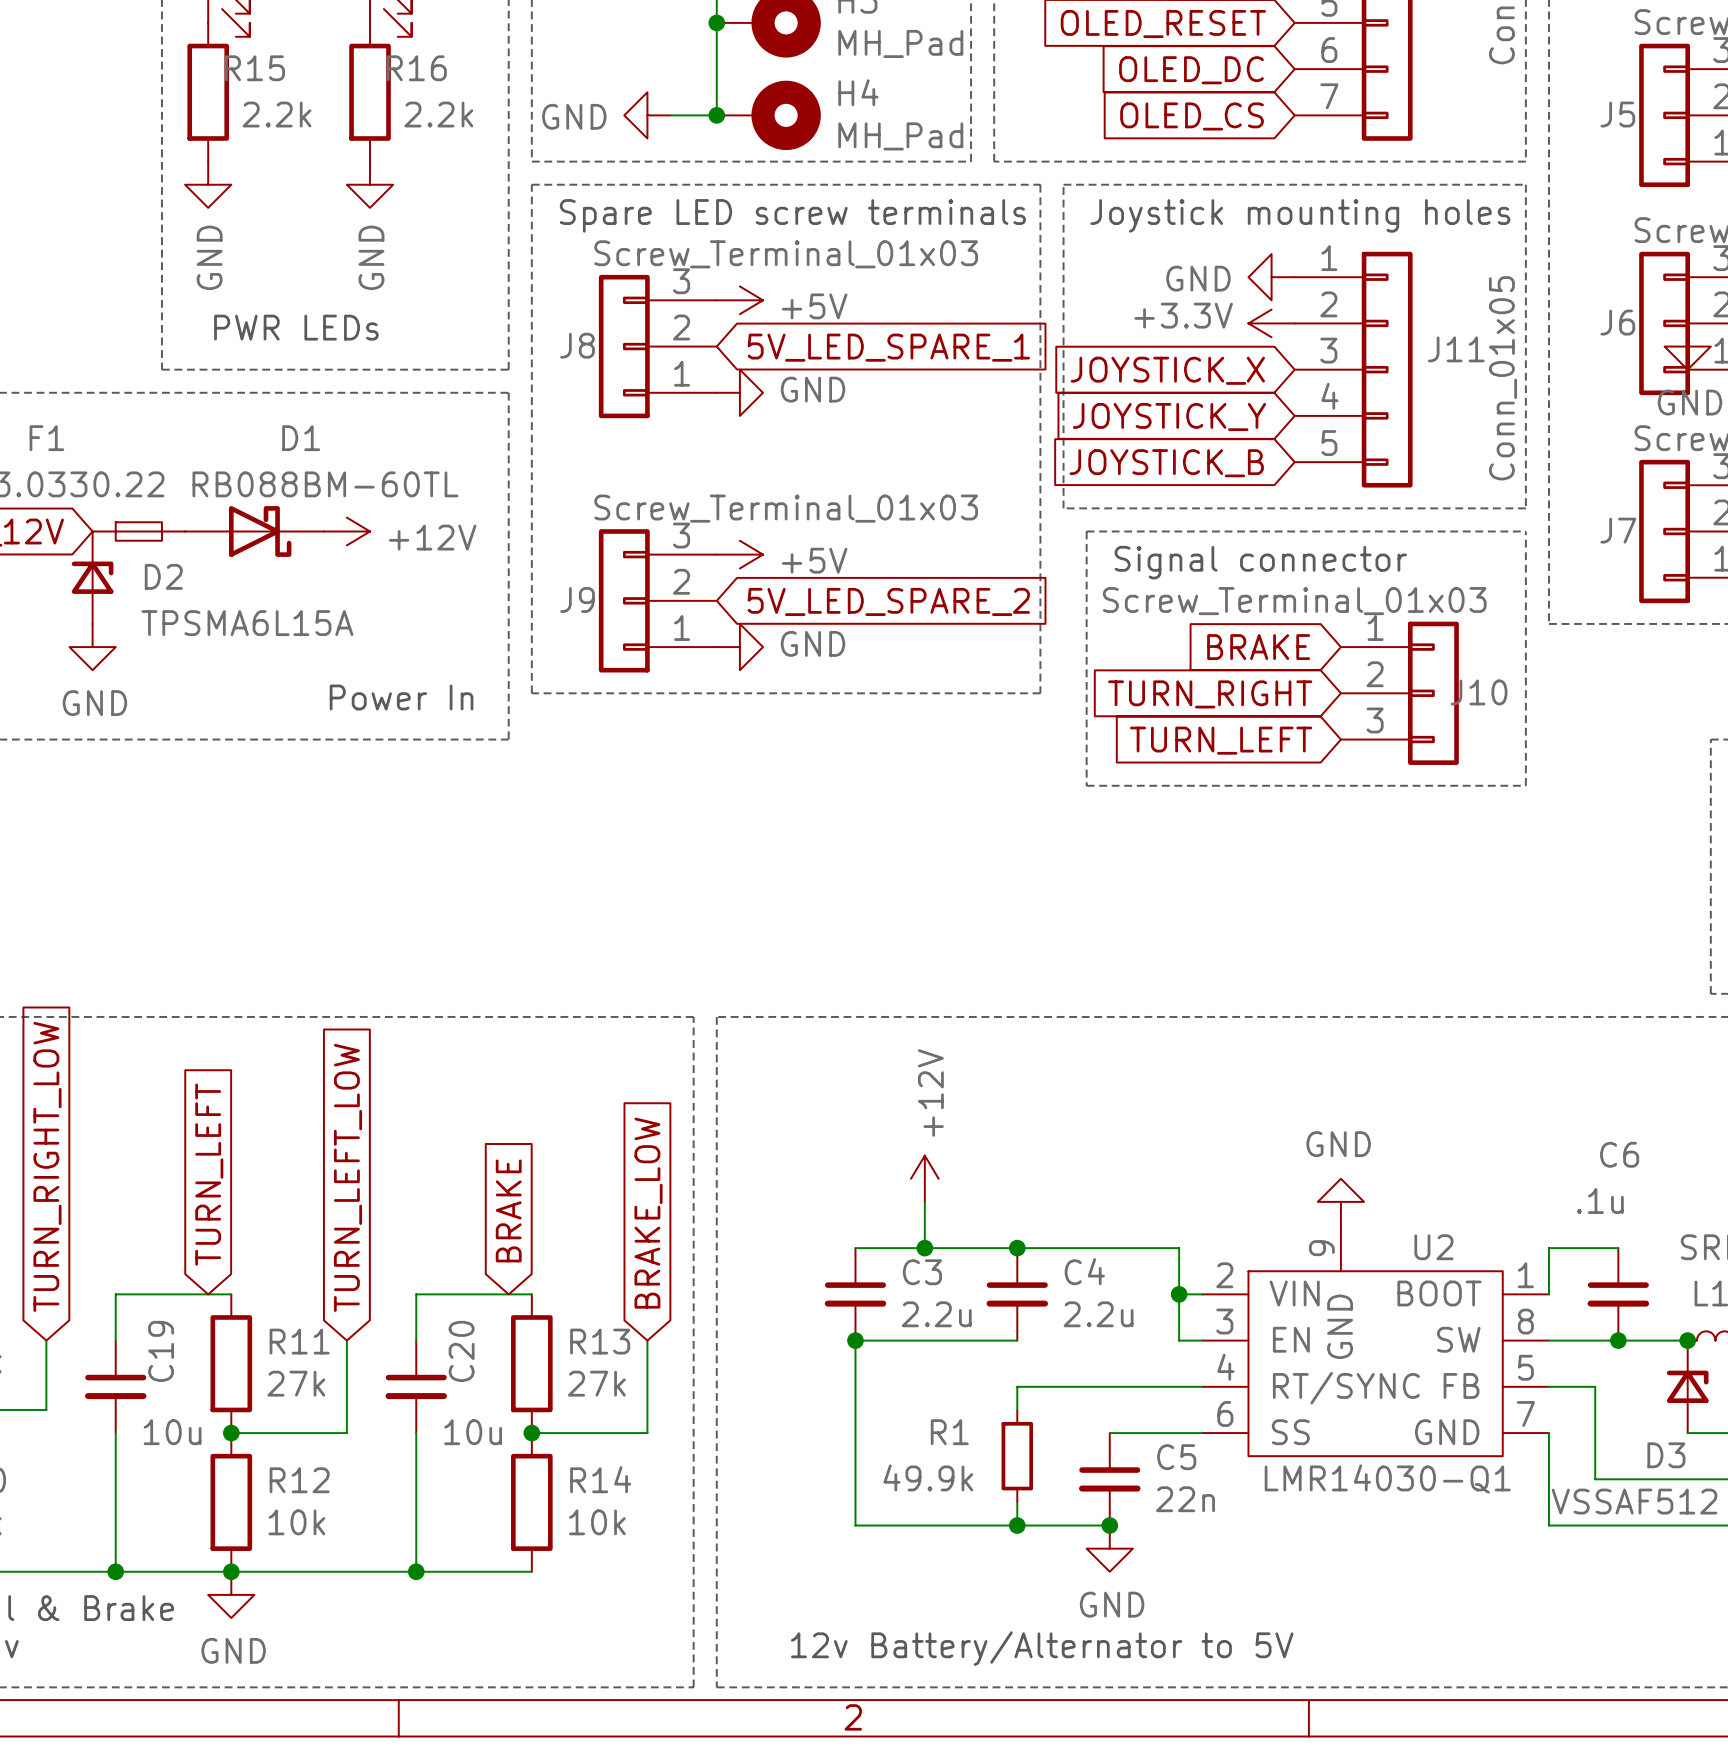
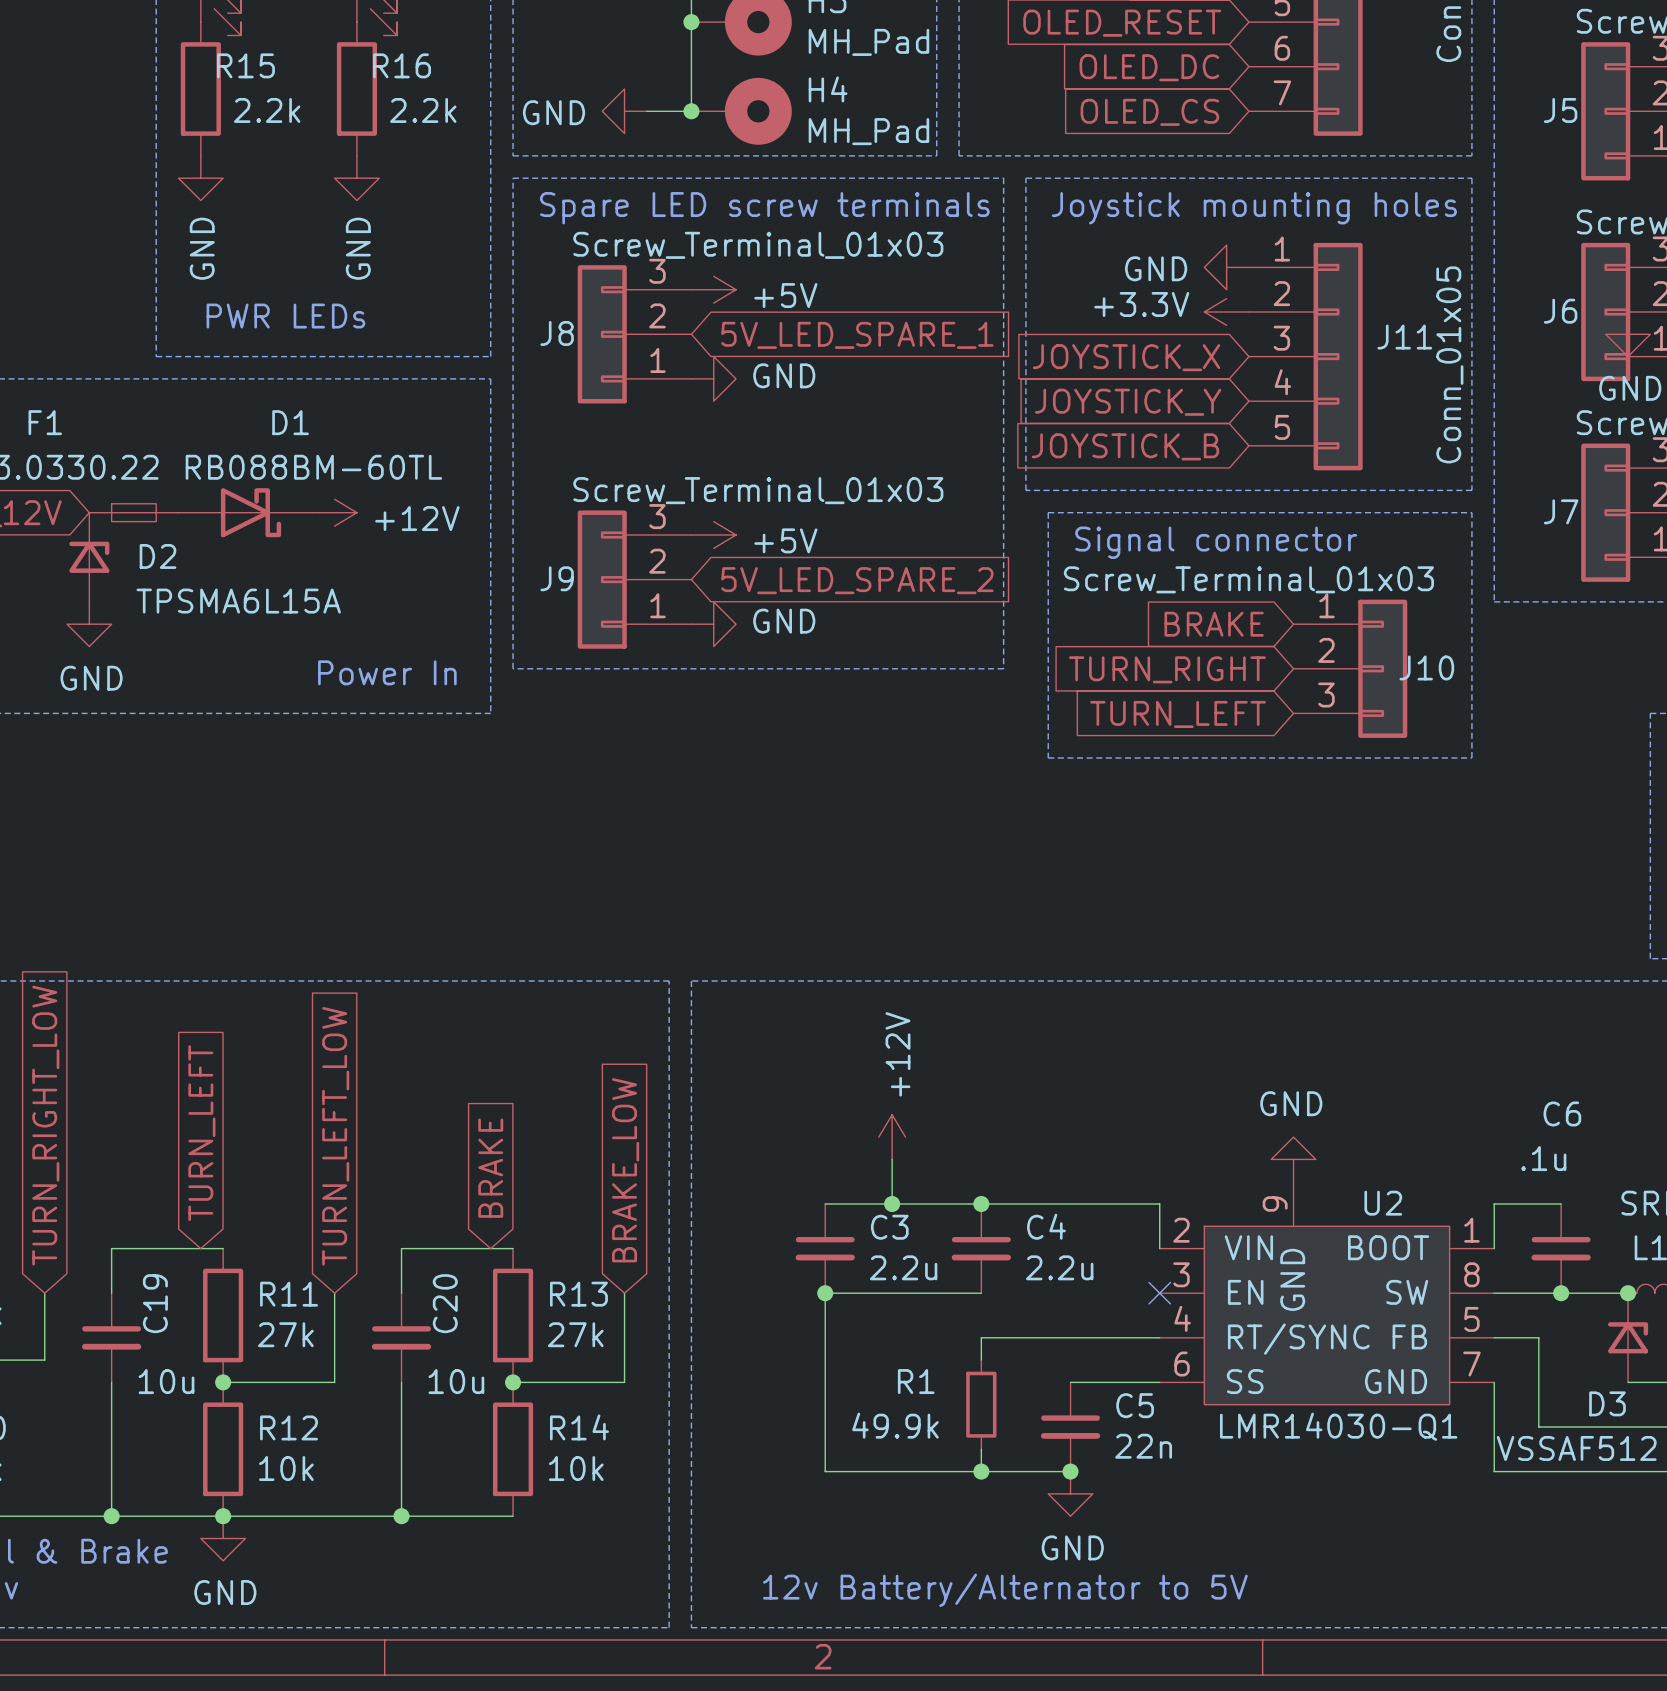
wire: (1179, 1248) (1179, 1340) (1202, 1340) -> (1137, 1204) (1159, 1204) (1159, 1248)
wire: (1179, 1294) (1202, 1294) -> none
junction: (1179, 1294) -> none
no-connect mark: none -> (1159, 1293)

